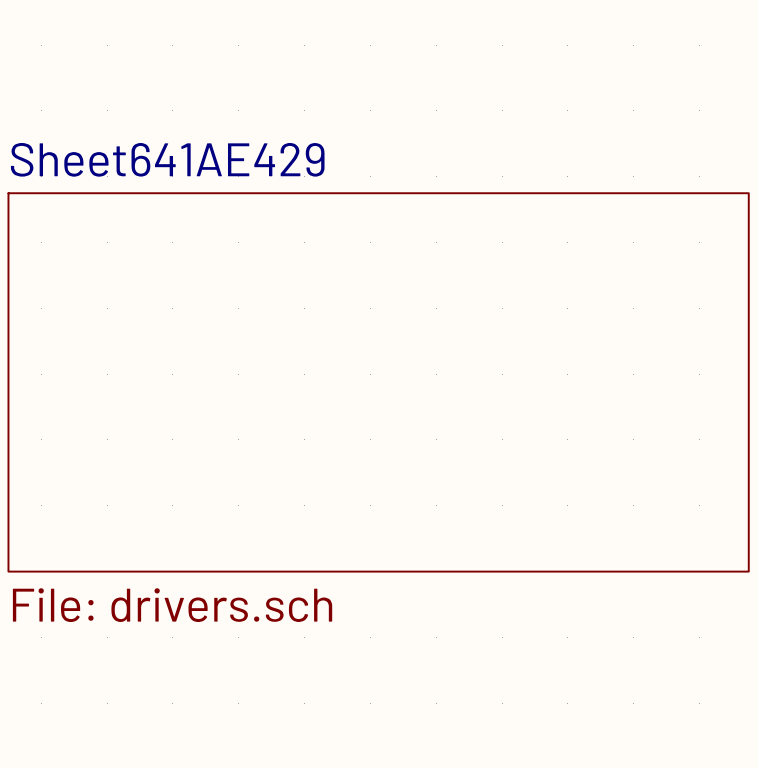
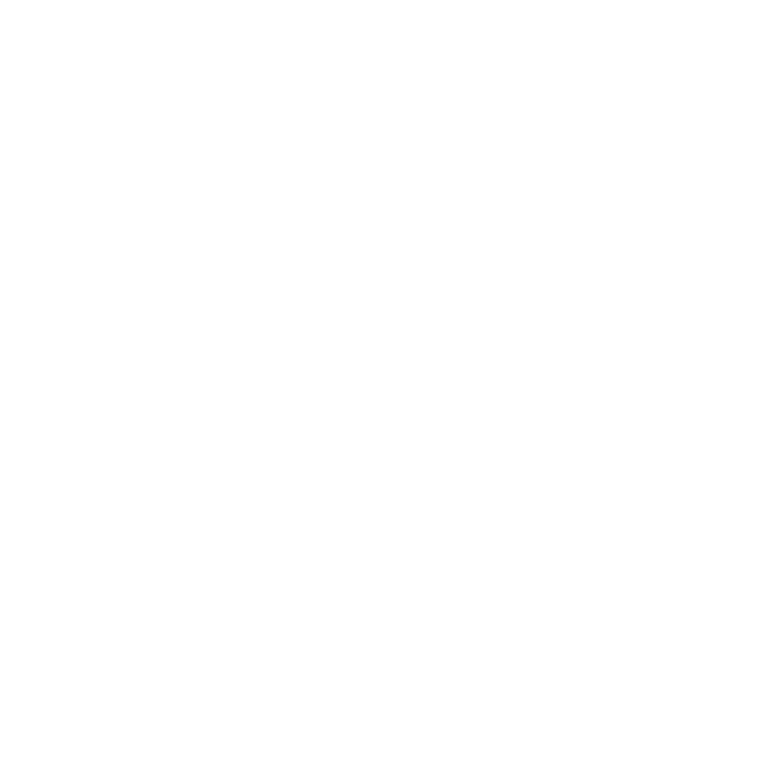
sheet Sheet641AE429: File: drivers.sch (378, 382) -> none

